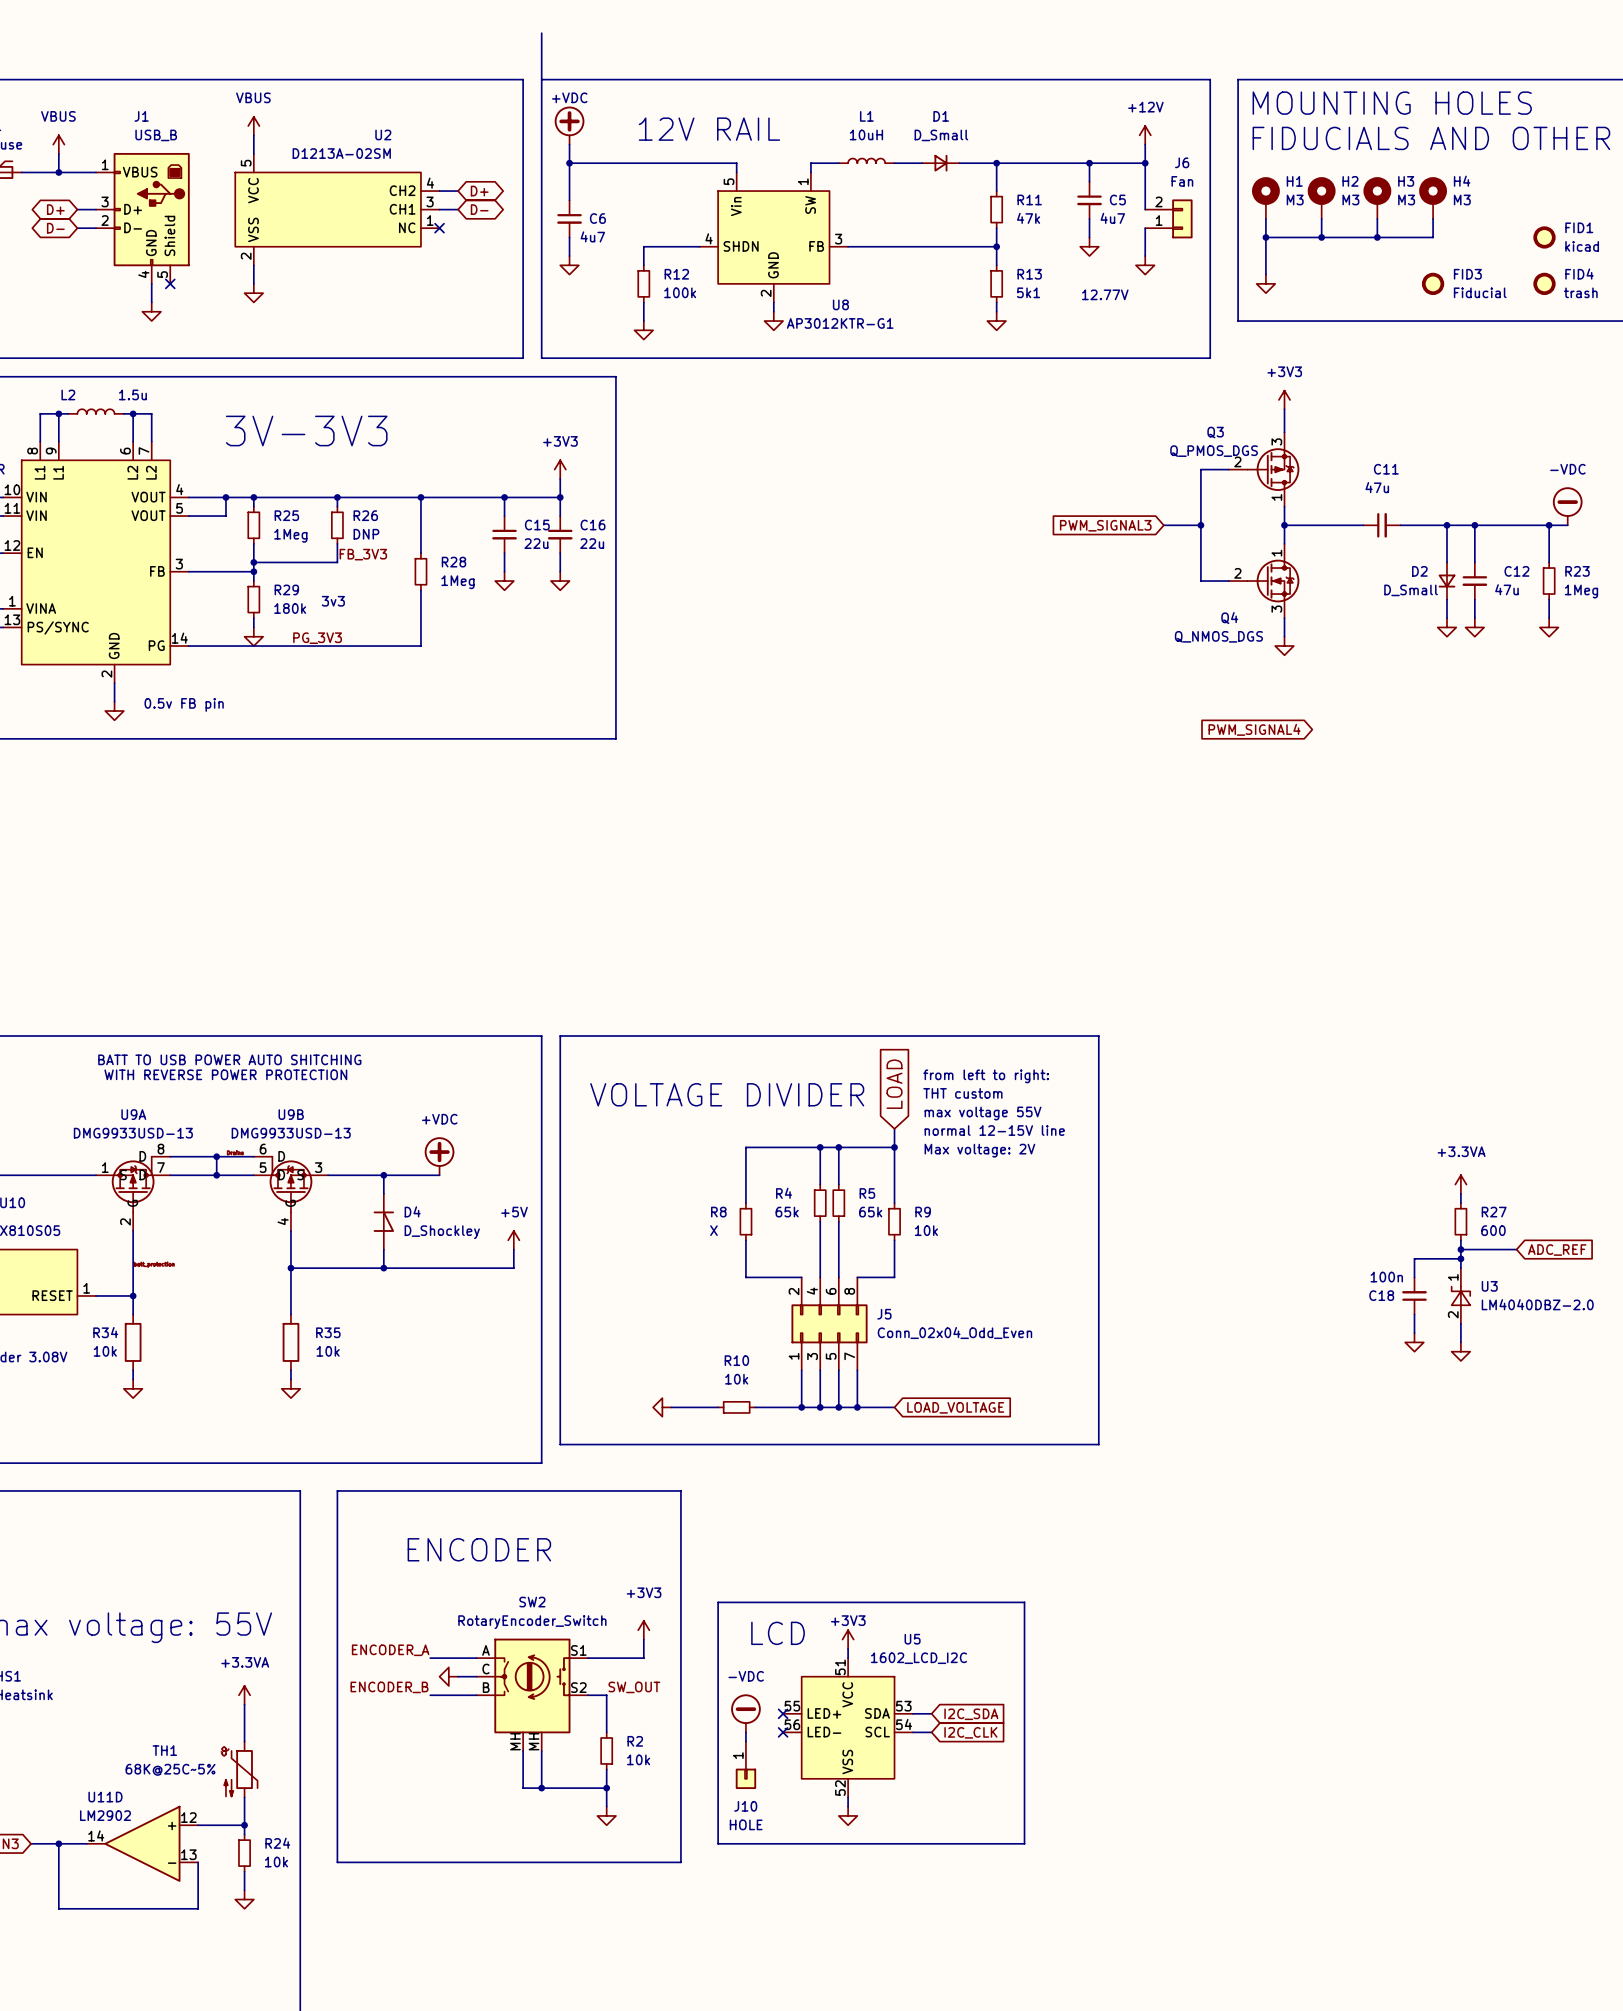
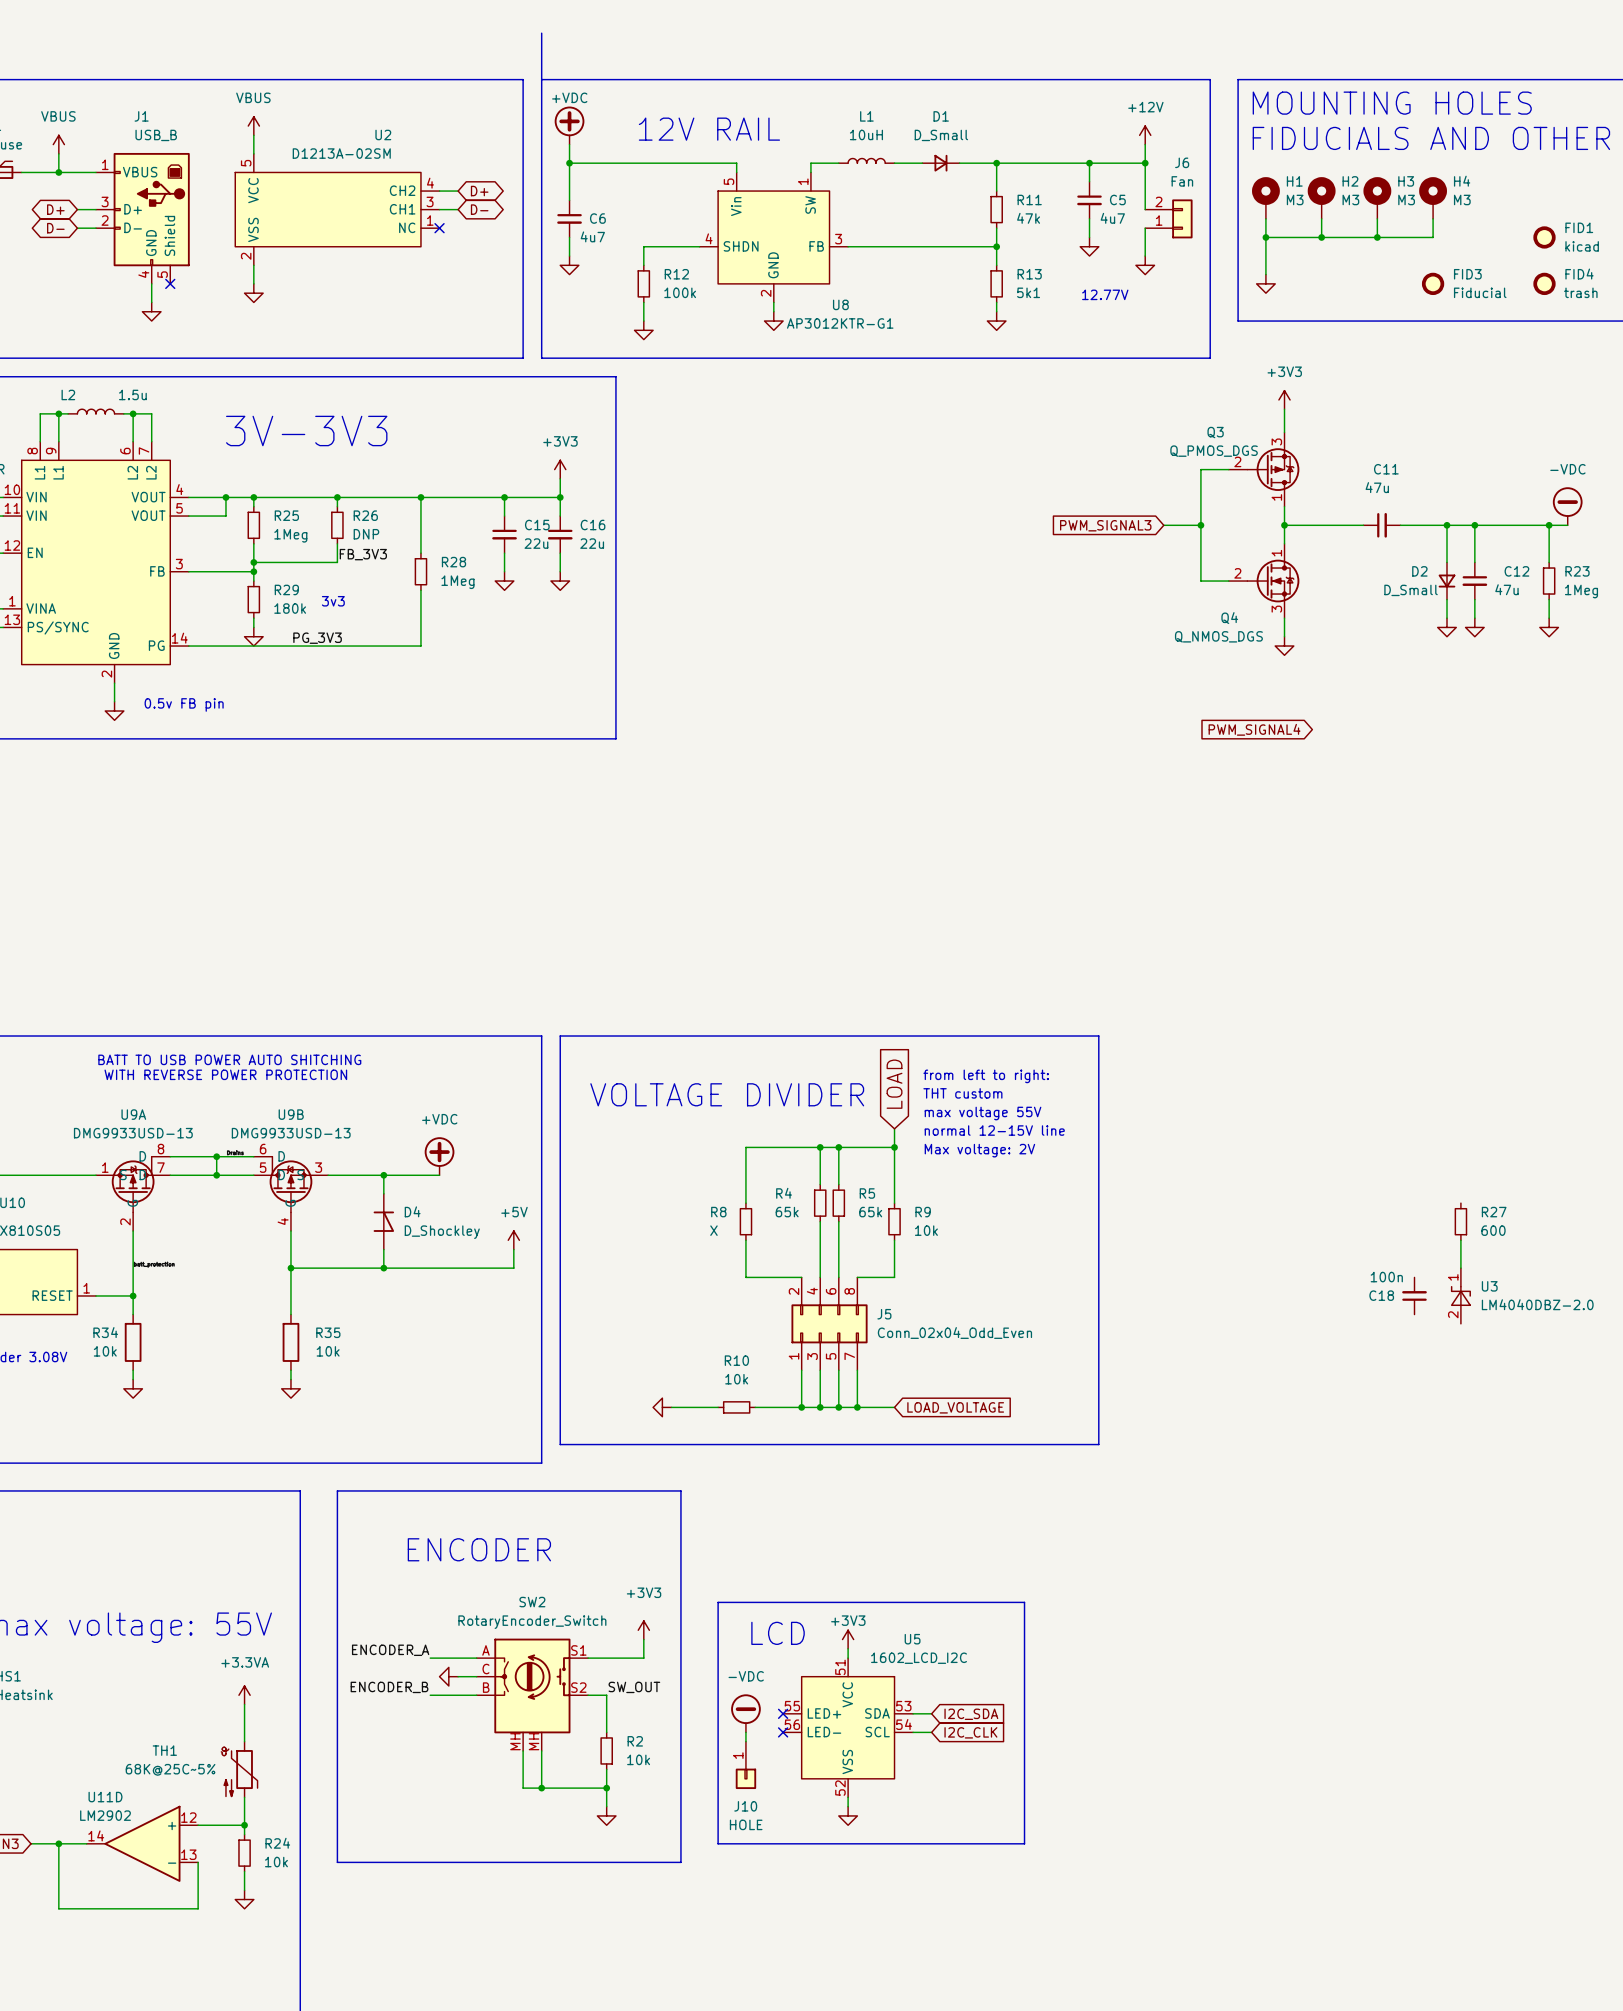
power symbol: +3.3VA (1460, 1184) -> none
wire: (1460, 1193) (1460, 1203) -> none
wire: (1460, 1249) (1516, 1249) -> none
junction: (1460, 1249) -> none
global label: ADC_REF (1557, 1250) -> none
wire: (1460, 1258) (1414, 1258) (1414, 1277) -> none
junction: (1460, 1258) -> none
wire: (1414, 1314) (1414, 1333) -> none
wire: (1460, 1323) (1460, 1342) -> none
power symbol: (1414, 1342) -> none
power symbol: (1460, 1351) -> none

